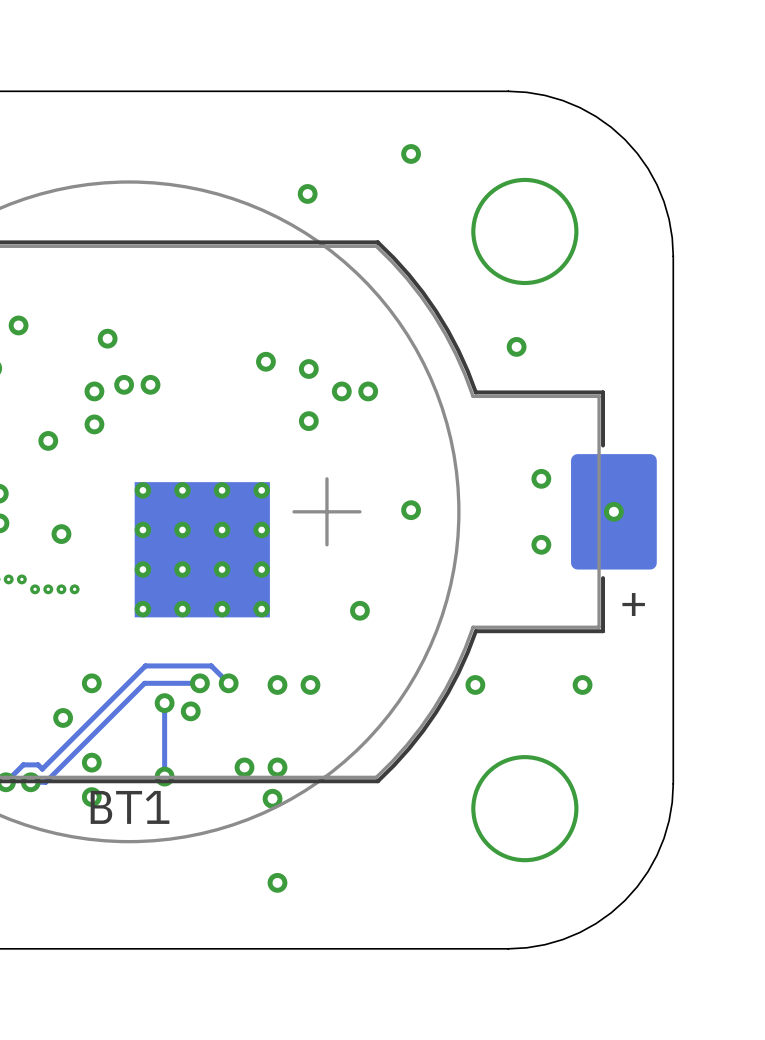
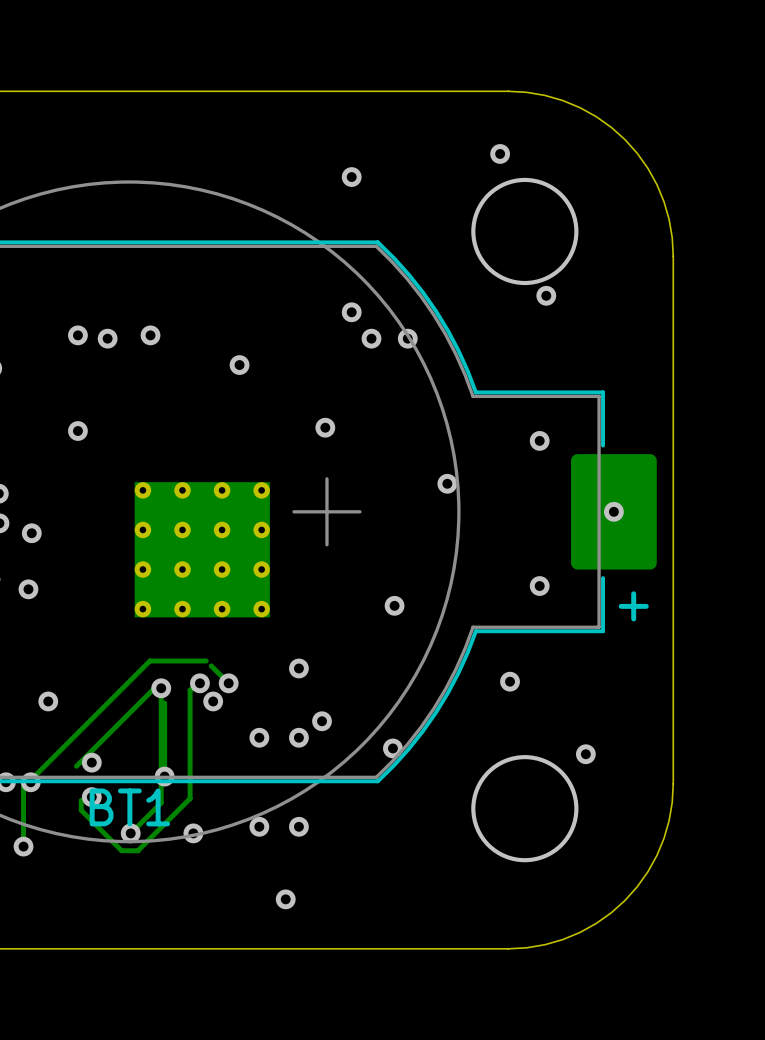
via: (411, 153) -> none
via: none -> (500, 153)
via: none -> (351, 177)
via: (307, 193) -> none
via: none -> (546, 295)
via: none -> (351, 312)
via: (18, 325) -> none
via: none -> (77, 335)
via: none -> (150, 335)
via: none -> (371, 338)
via: none -> (407, 338)
via: (516, 346) -> none
via position: (265, 361) -> (239, 365)
via: (308, 369) -> none
via: (124, 384) -> none
via: (150, 384) -> none
via: (94, 391) -> none
via: (341, 391) -> none
via: (368, 391) -> none
via position: (308, 421) -> (325, 427)
via position: (94, 424) -> (77, 431)
via: (48, 440) -> none
via position: (541, 478) -> (539, 440)
via position: (411, 510) -> (447, 483)
via position: (61, 534) -> (31, 533)
via position: (541, 544) -> (539, 586)
via: (8, 579) -> none
via: (21, 579) -> none
via: none -> (28, 589)
via: (35, 589) -> none
via: (48, 589) -> none
via: (61, 589) -> none
via: (74, 589) -> none
via position: (359, 610) -> (394, 605)
track: none -> (206, 660) (149, 660) (23, 787) (23, 846)
track: (211, 665) (145, 665) (42, 769) (38, 764) (23, 764) (5, 782) -> none
track: none -> (199, 680) (190, 690) (190, 798) (137, 850) (121, 850) (81, 810) (81, 800)
via: (91, 683) -> none
via: (277, 684) -> none
via position: (310, 684) -> (298, 668)
via position: (475, 684) -> (510, 681)
via: (582, 684) -> none
track: (196, 686) (199, 683) (144, 683) (45, 782) (30, 782) -> none
via: none -> (213, 701)
via position: (164, 703) -> (161, 688)
via: (190, 711) -> none
via position: (63, 717) -> (48, 701)
via: none -> (322, 721)
via: none -> (259, 737)
via: none -> (298, 737)
via: none -> (392, 748)
via: none -> (585, 754)
track: none -> (76, 766) (154, 688) (161, 688) (161, 802) (130, 833)
via: (244, 767) -> none
via: (277, 767) -> none
via: (272, 798) -> none
via: none -> (259, 826)
via: none -> (298, 826)
via: none -> (130, 833)
via: none -> (193, 833)
via: none -> (23, 846)
via position: (277, 882) -> (285, 899)

